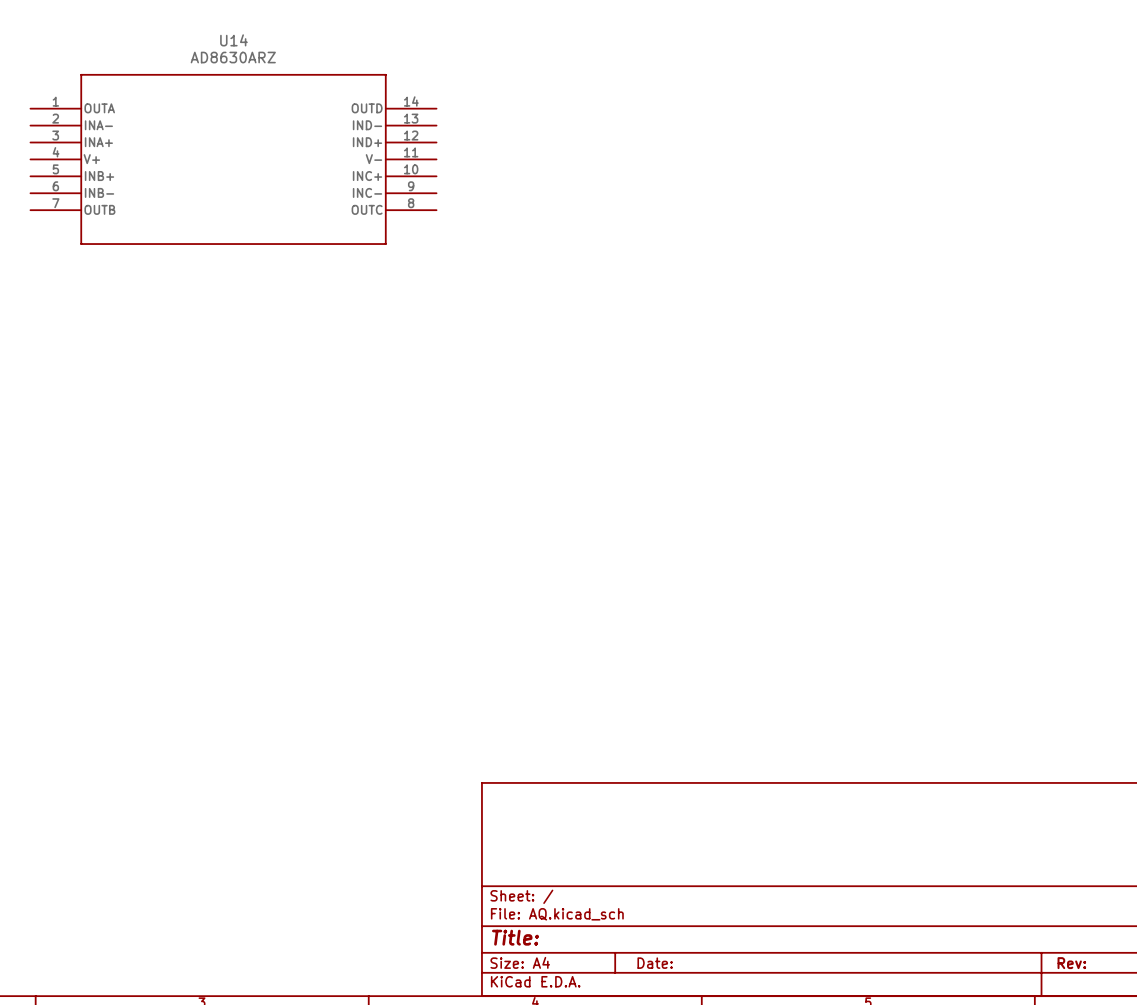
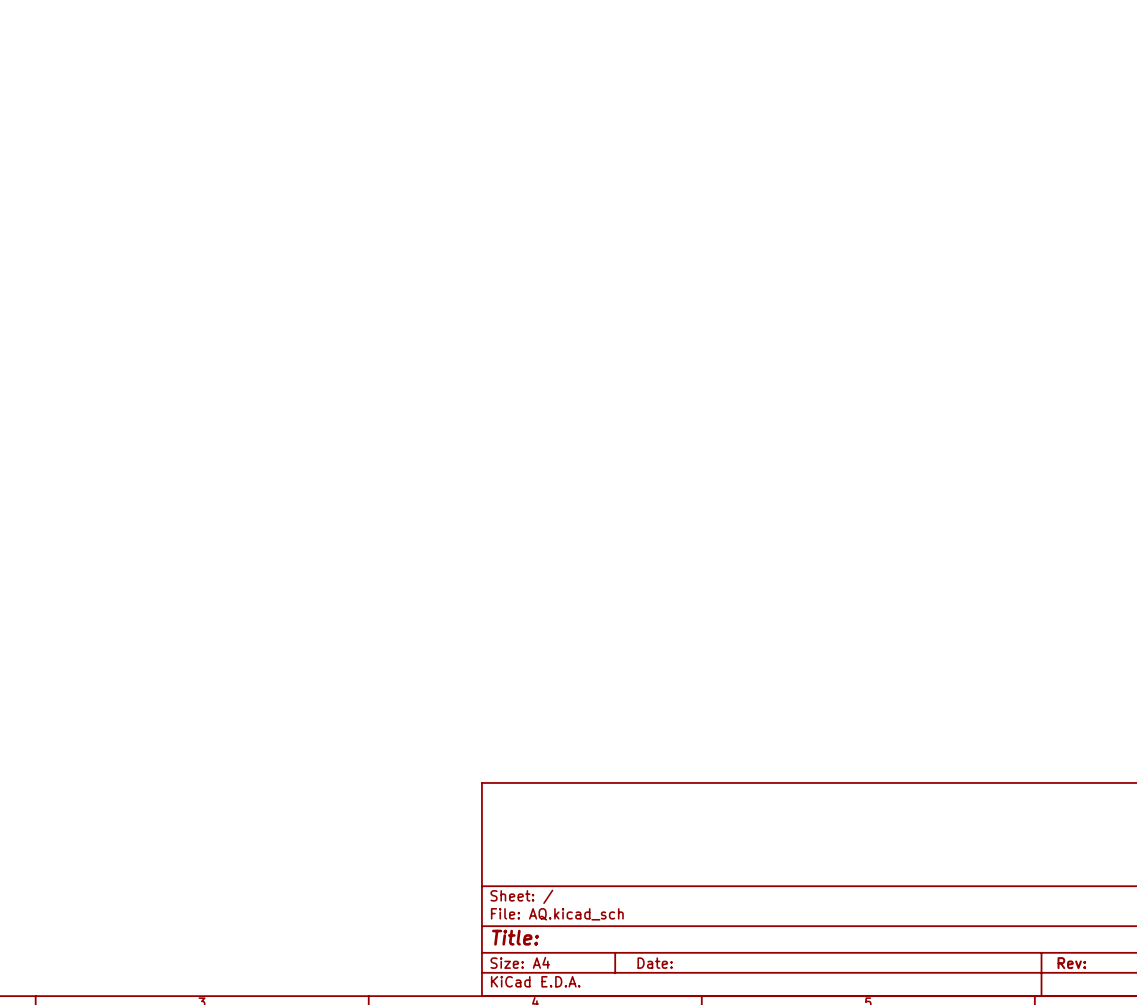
U14: AD8630ARZ (233, 159) -> none

